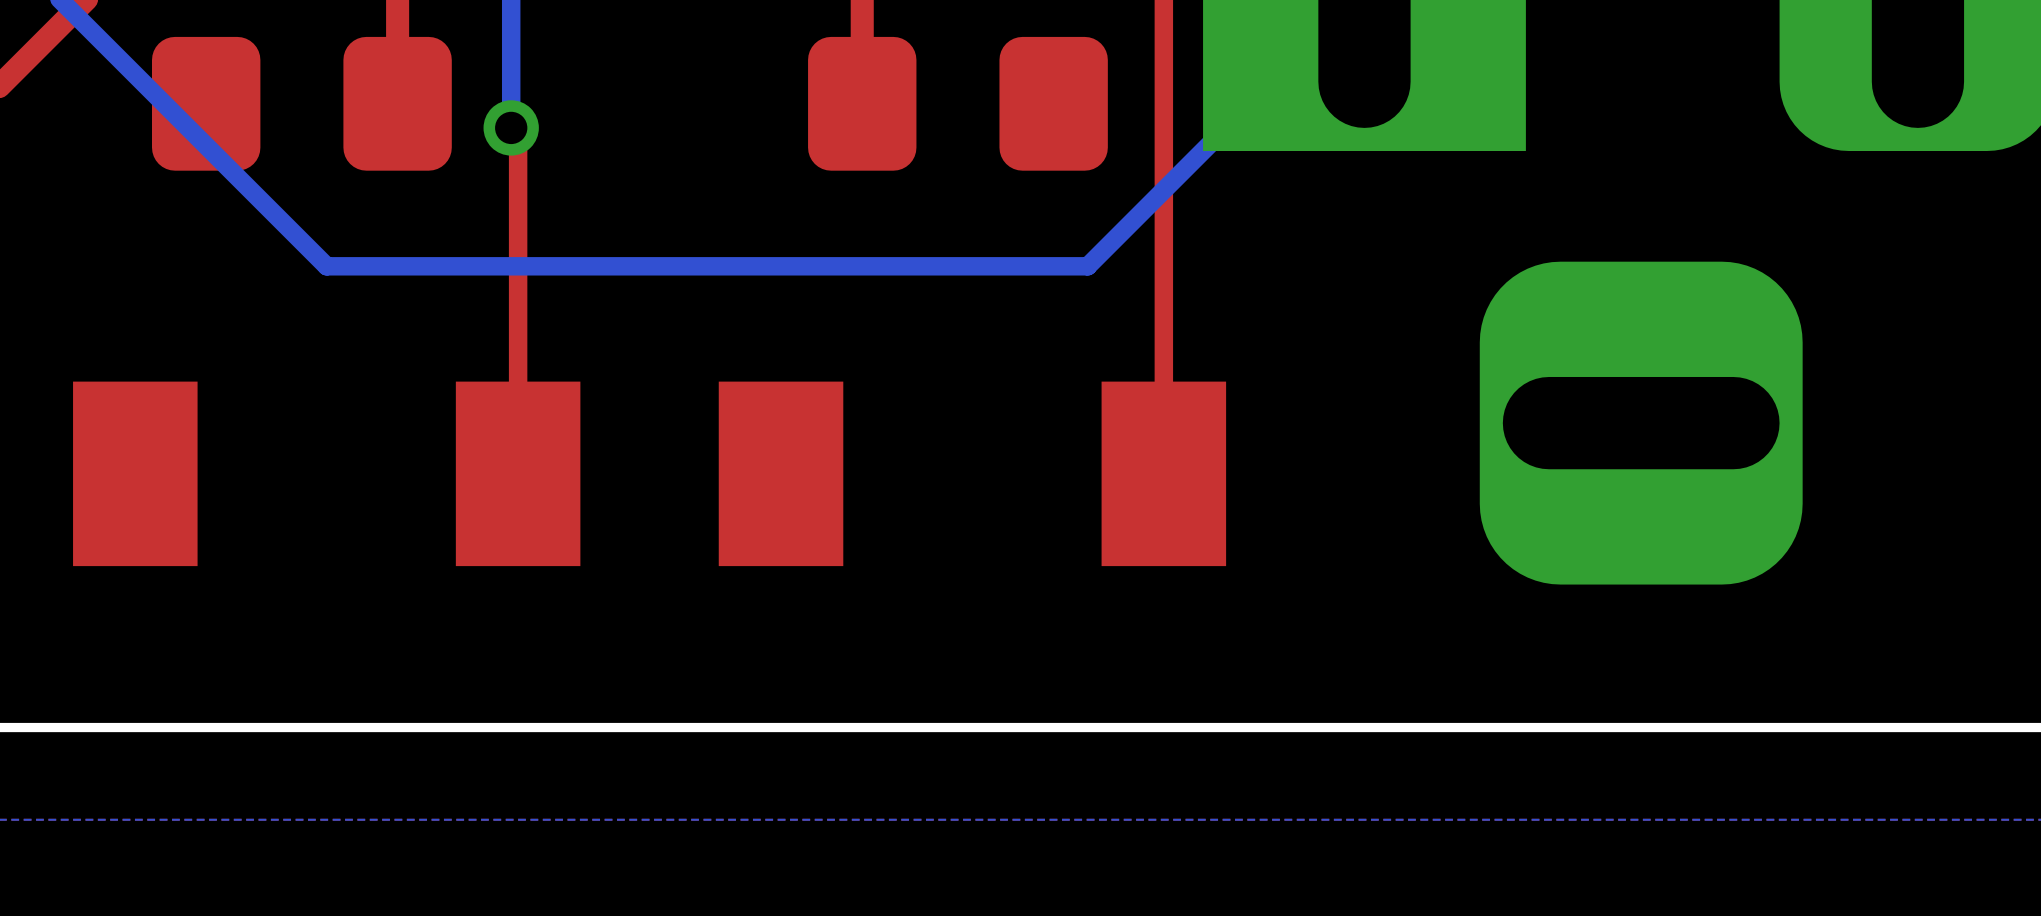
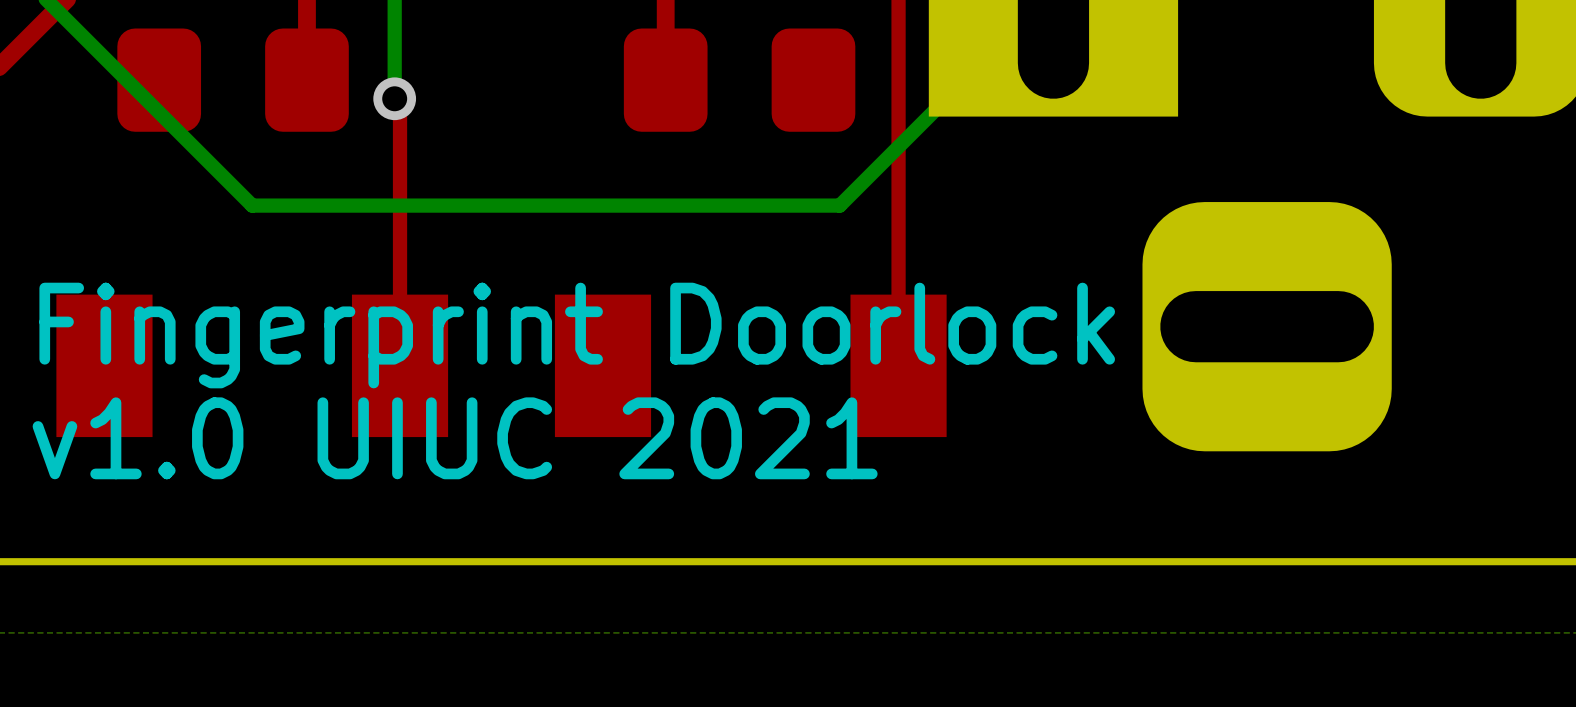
text: none -> Fingerprint Doorlock (577, 335)
text: none -> v1.0 UIUC 2021 (455, 438)

